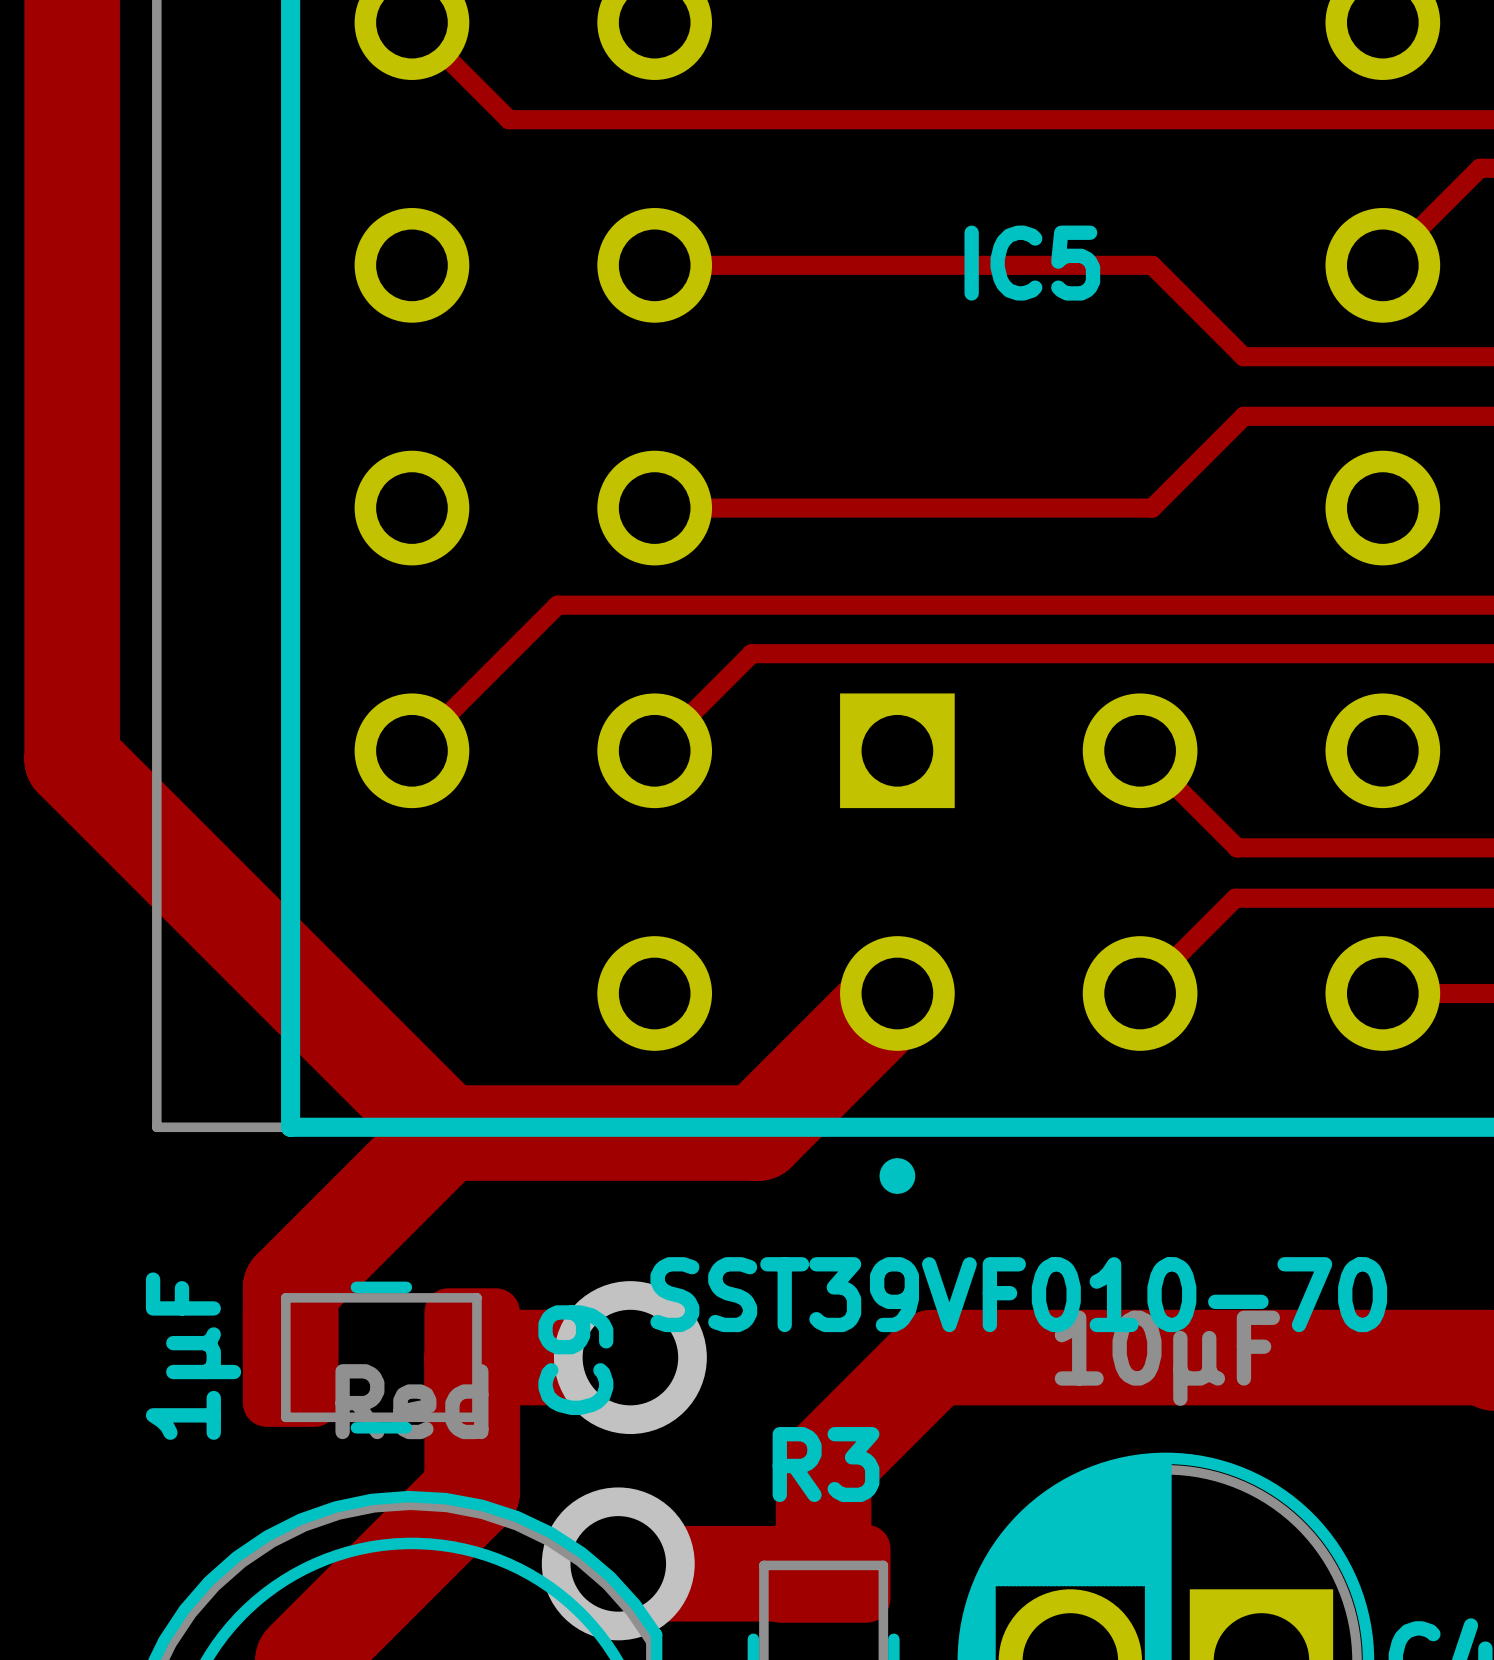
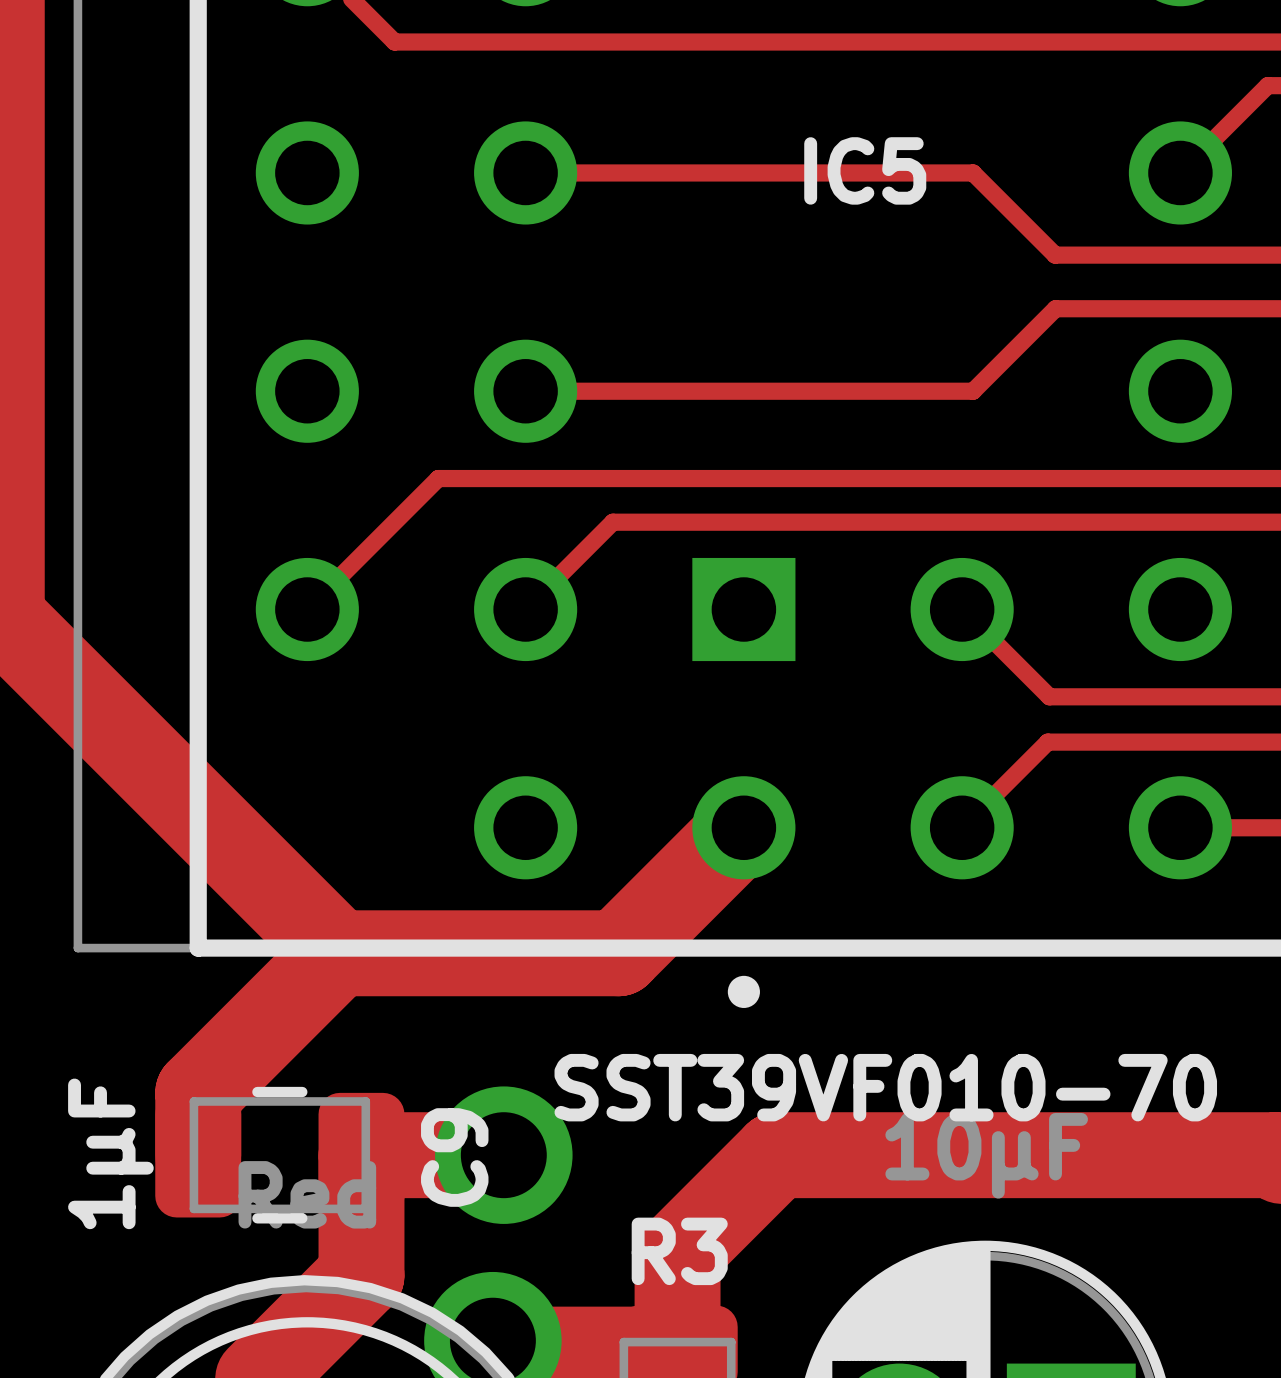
IC5 text position: SST39VF010-70 (1018, 1294) -> SST39VF010-70 (885, 1087)

